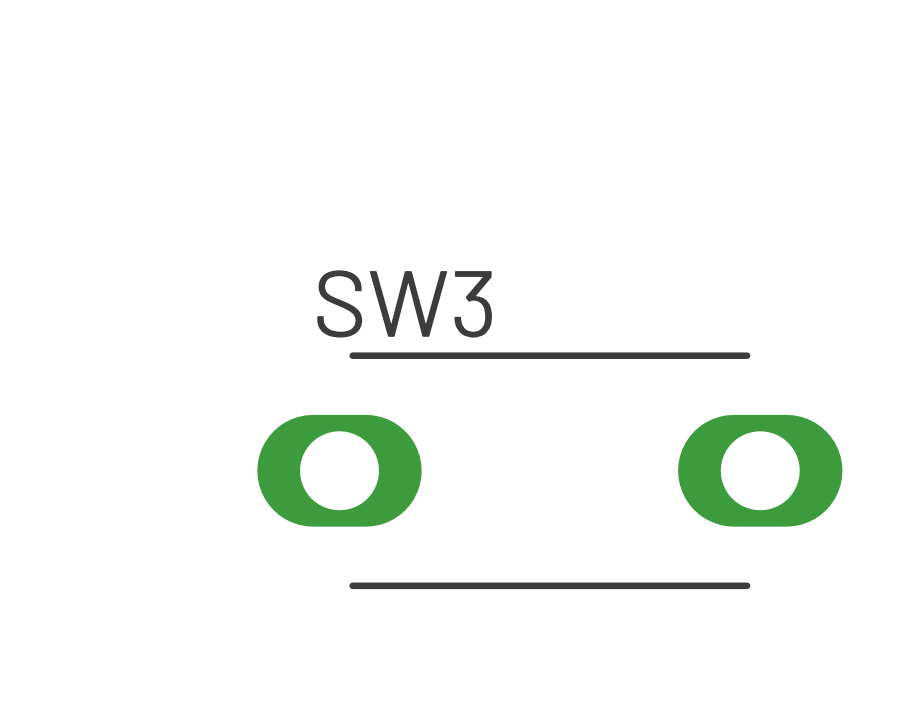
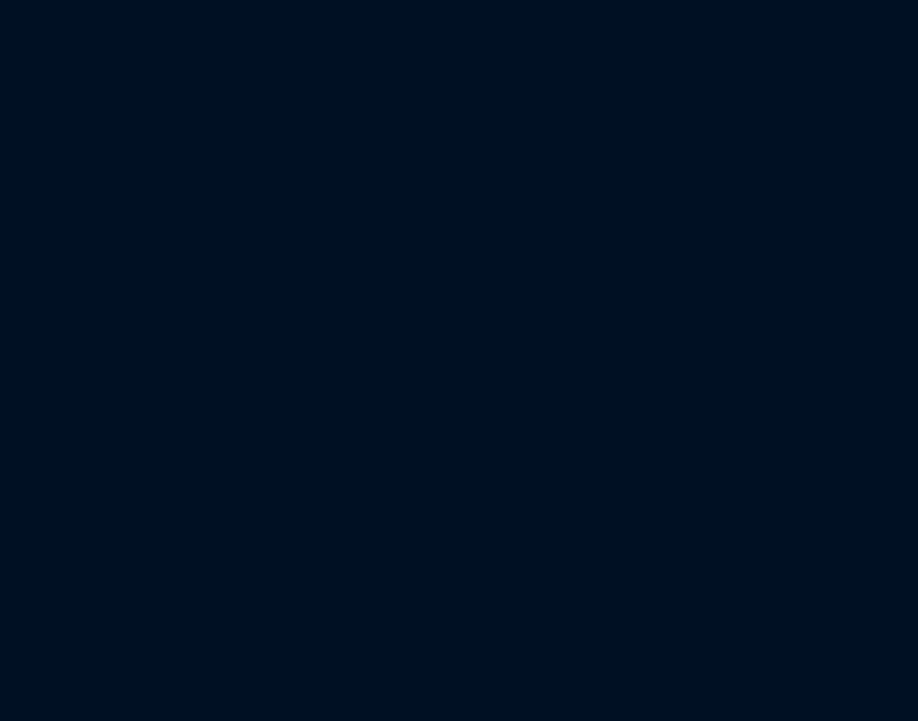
SW3: (549, 470) -> none

